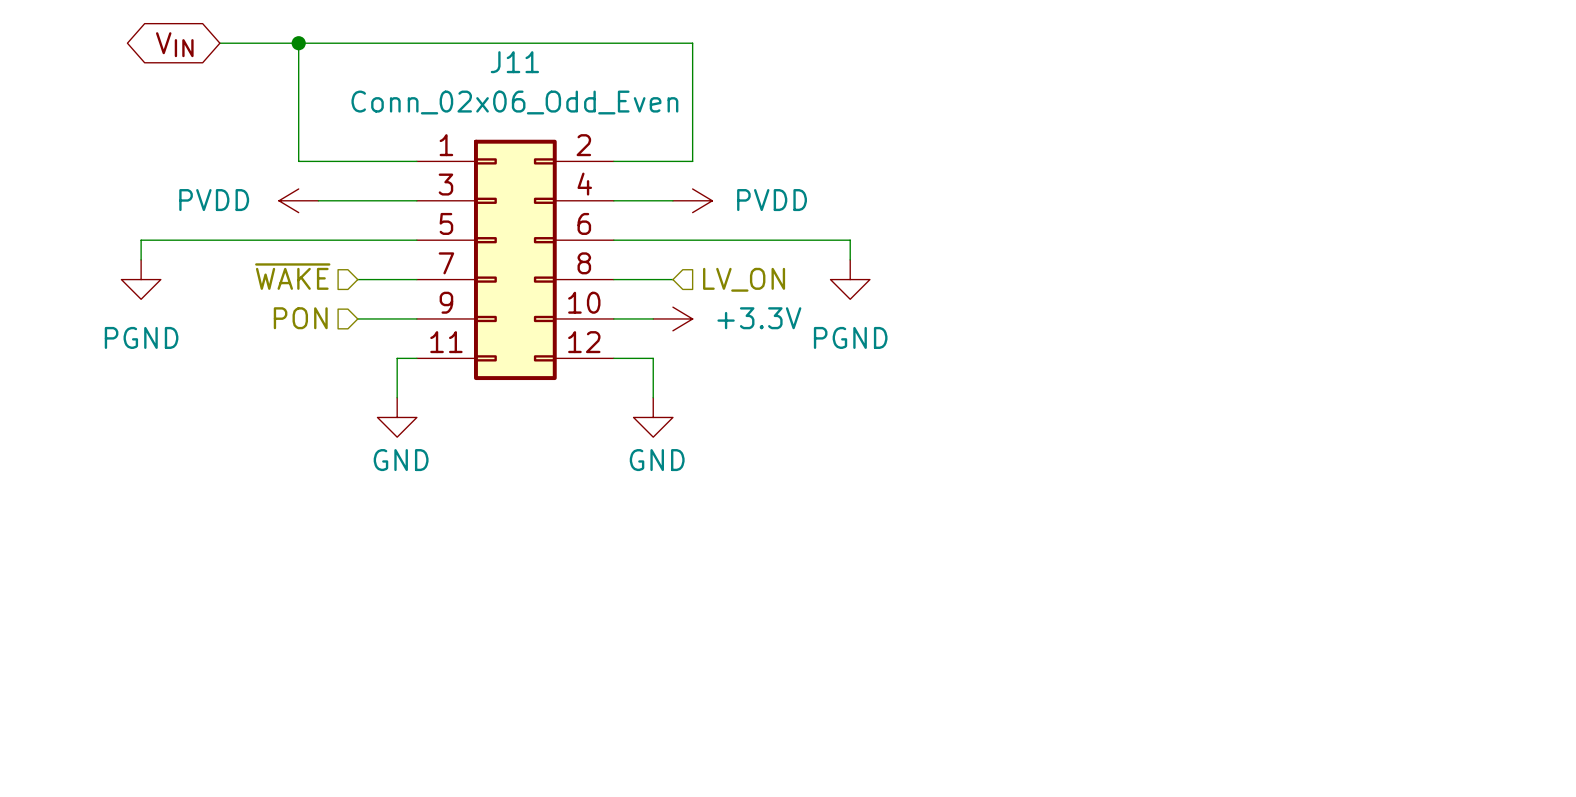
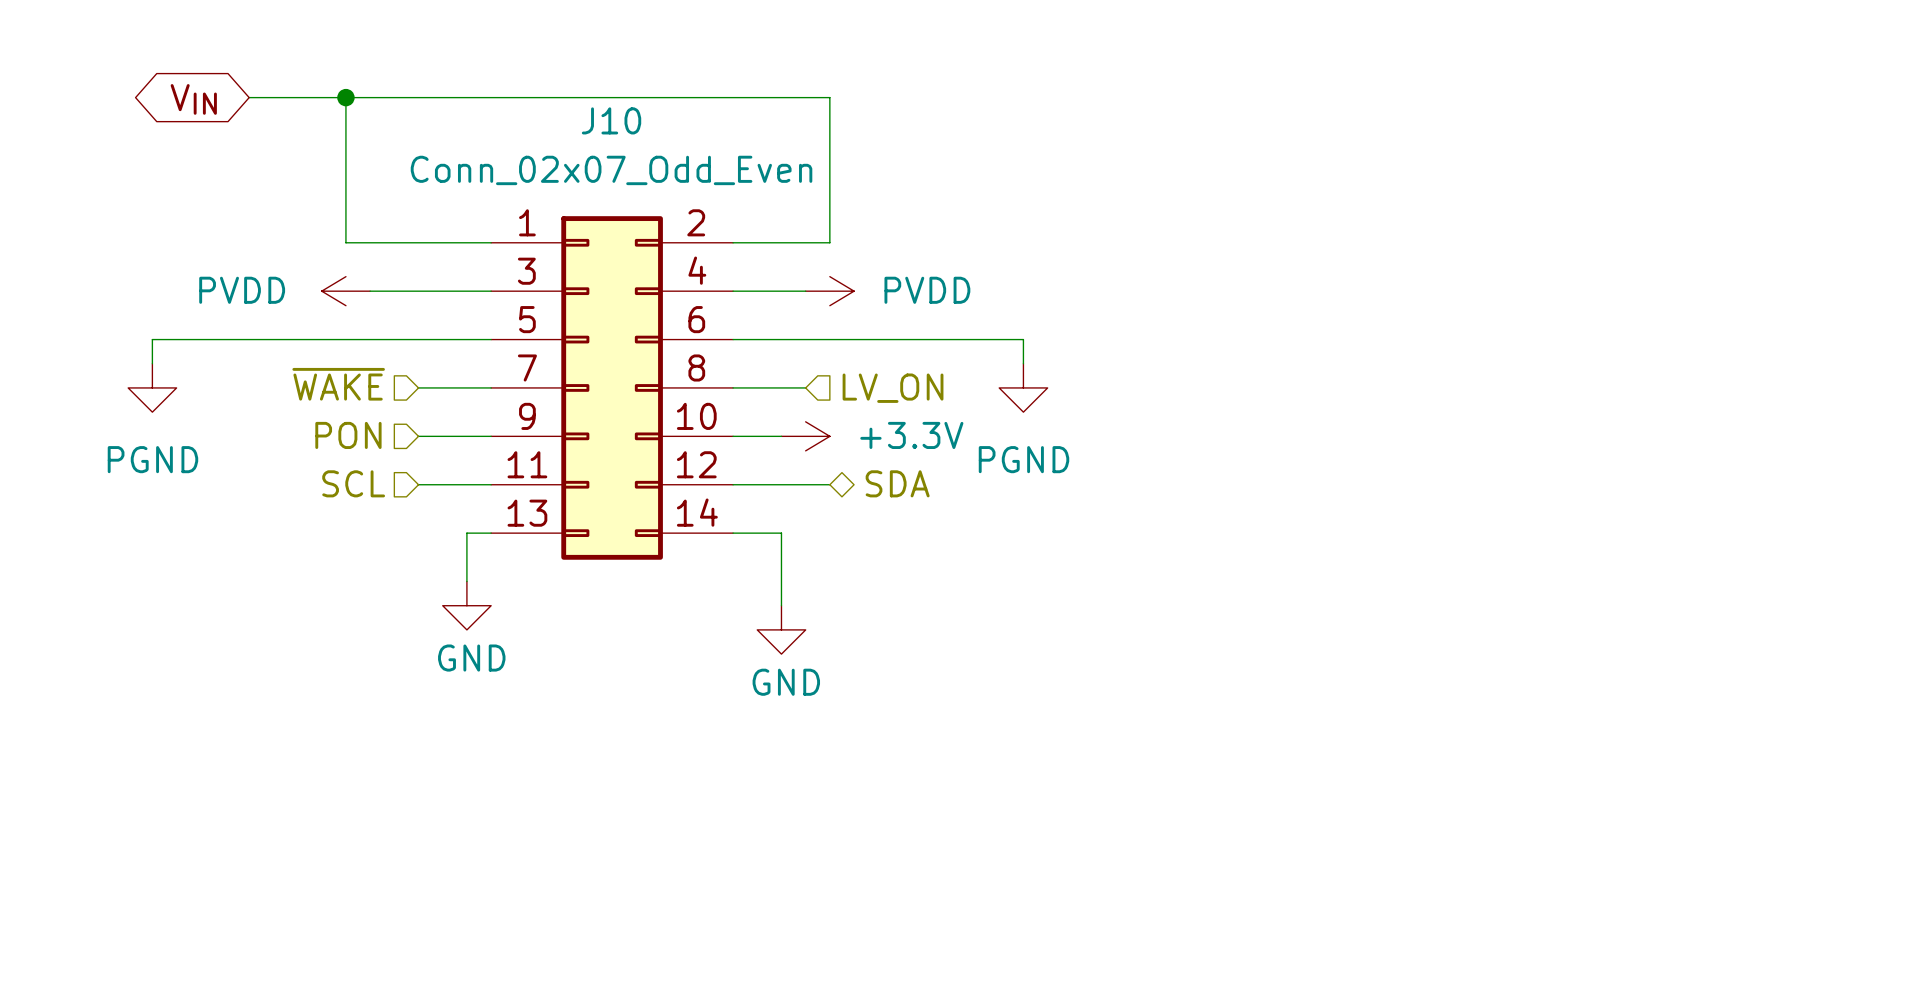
J11: Conn_02x06_Odd_Even (515, 259) -> none
J10: none -> Conn_02x07_Odd_Even (612, 387)
hierarchical label: none -> SCL (353, 483)
hierarchical label: none -> SDA (897, 483)
wire: (397, 358) (397, 397) -> (466, 484) (418, 484)
wire: (653, 358) (653, 397) -> (781, 484) (829, 484)
wire: none -> (491, 533) (466, 533) (466, 581)
wire: none -> (733, 533) (781, 533) (781, 605)
power symbol position: GND (397, 417) -> GND (466, 605)
power symbol position: GND (653, 417) -> GND (781, 629)

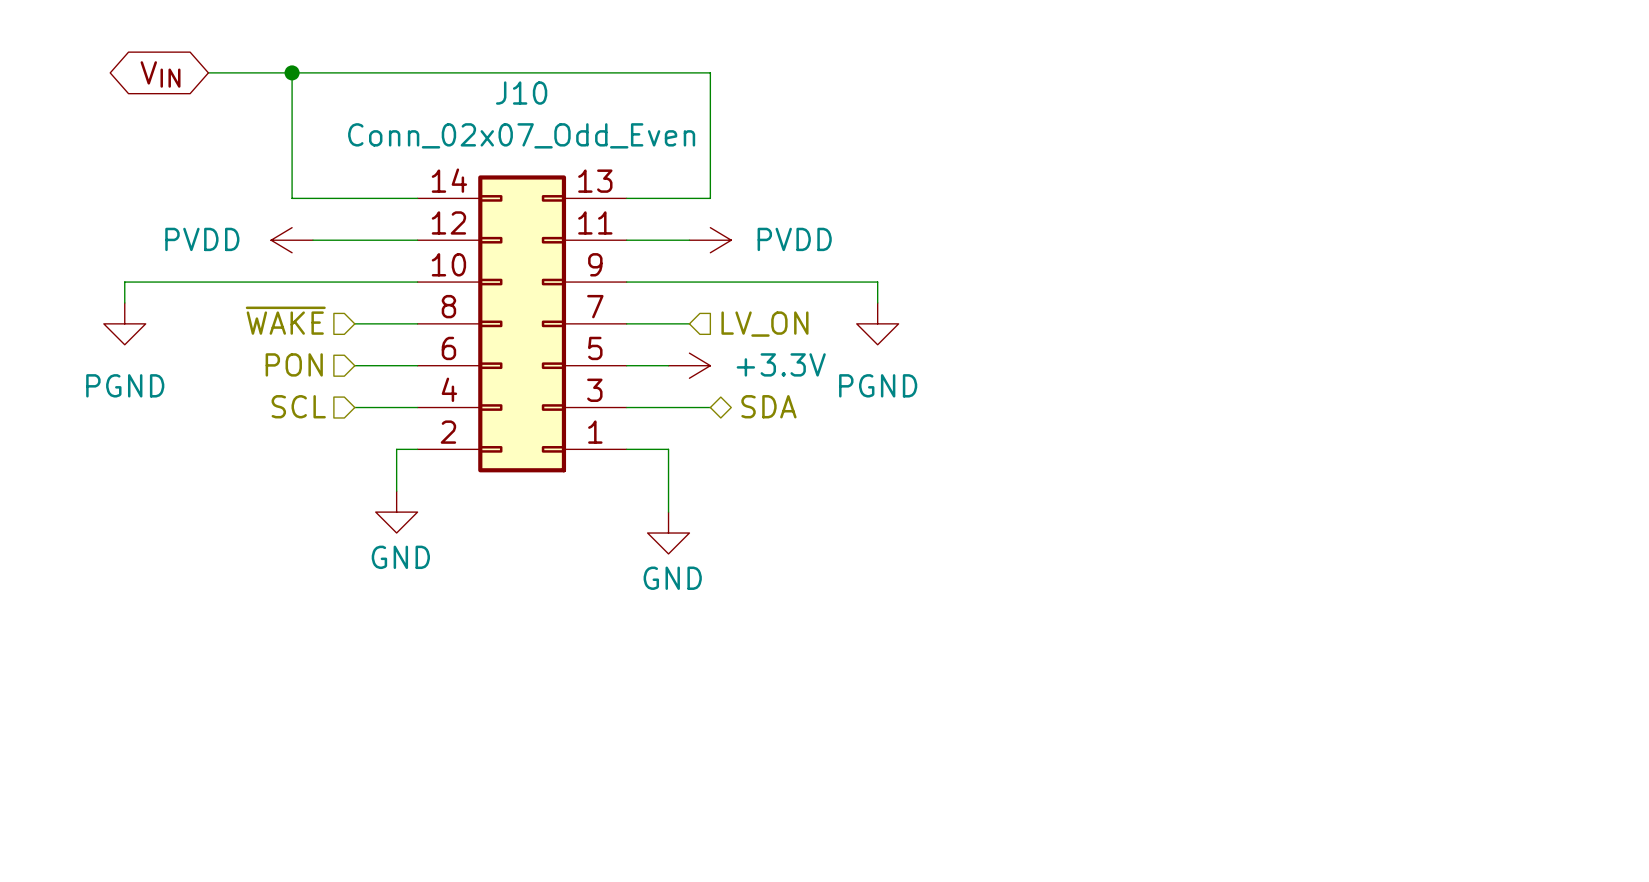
J10 rotation: 0° (612, 387) -> 180° (522, 323)

